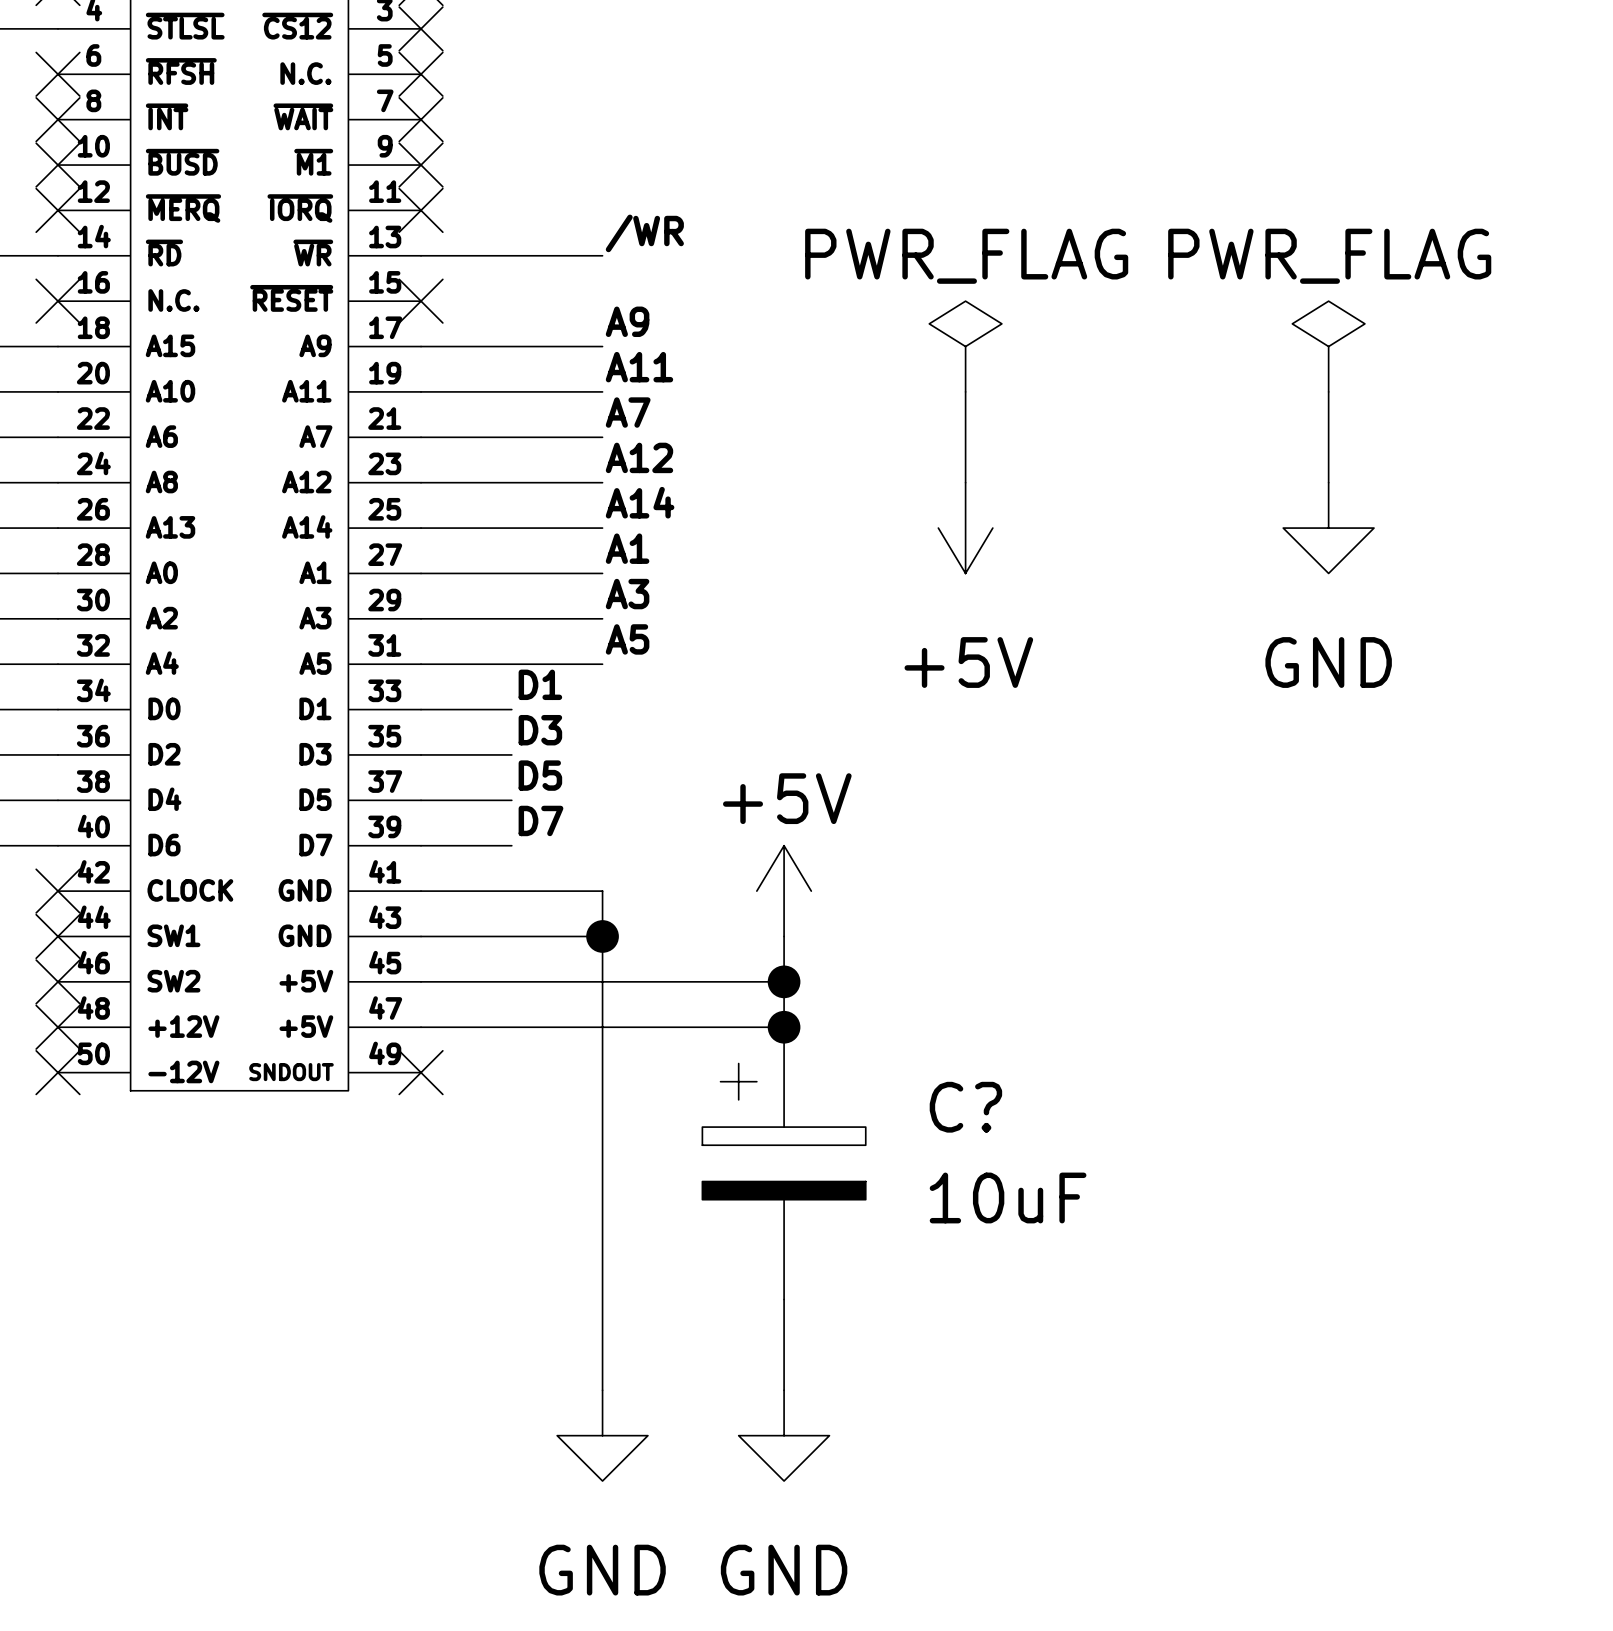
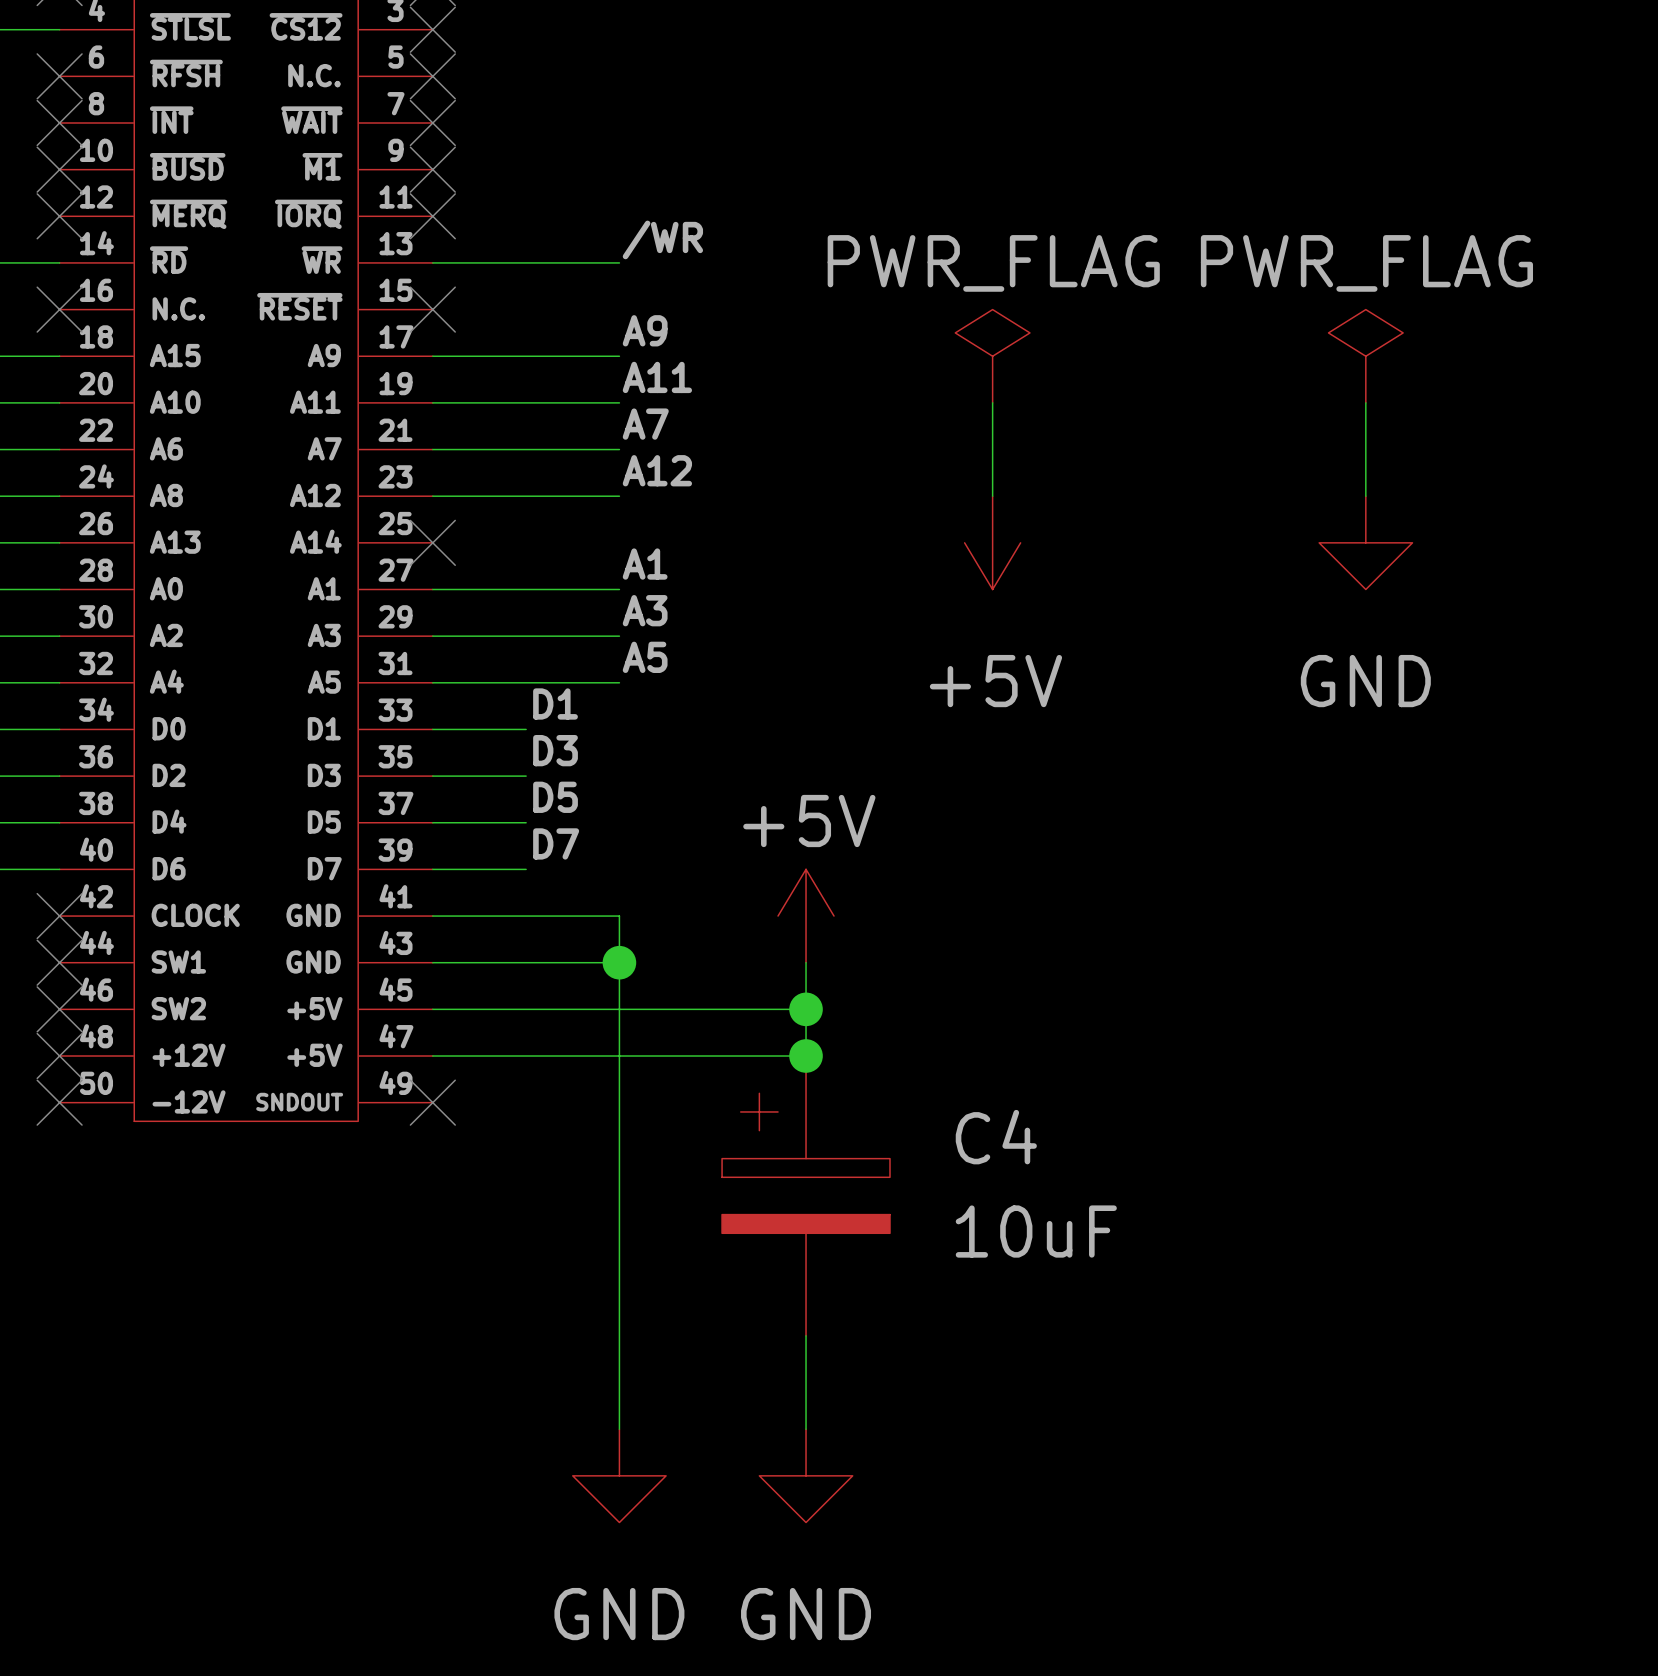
label: A14 (640, 502) -> none
wire: (421, 528) (602, 528) -> none
no-connect mark: none -> (432, 542)
C? name: C? (965, 1107) -> C4 (996, 1137)

